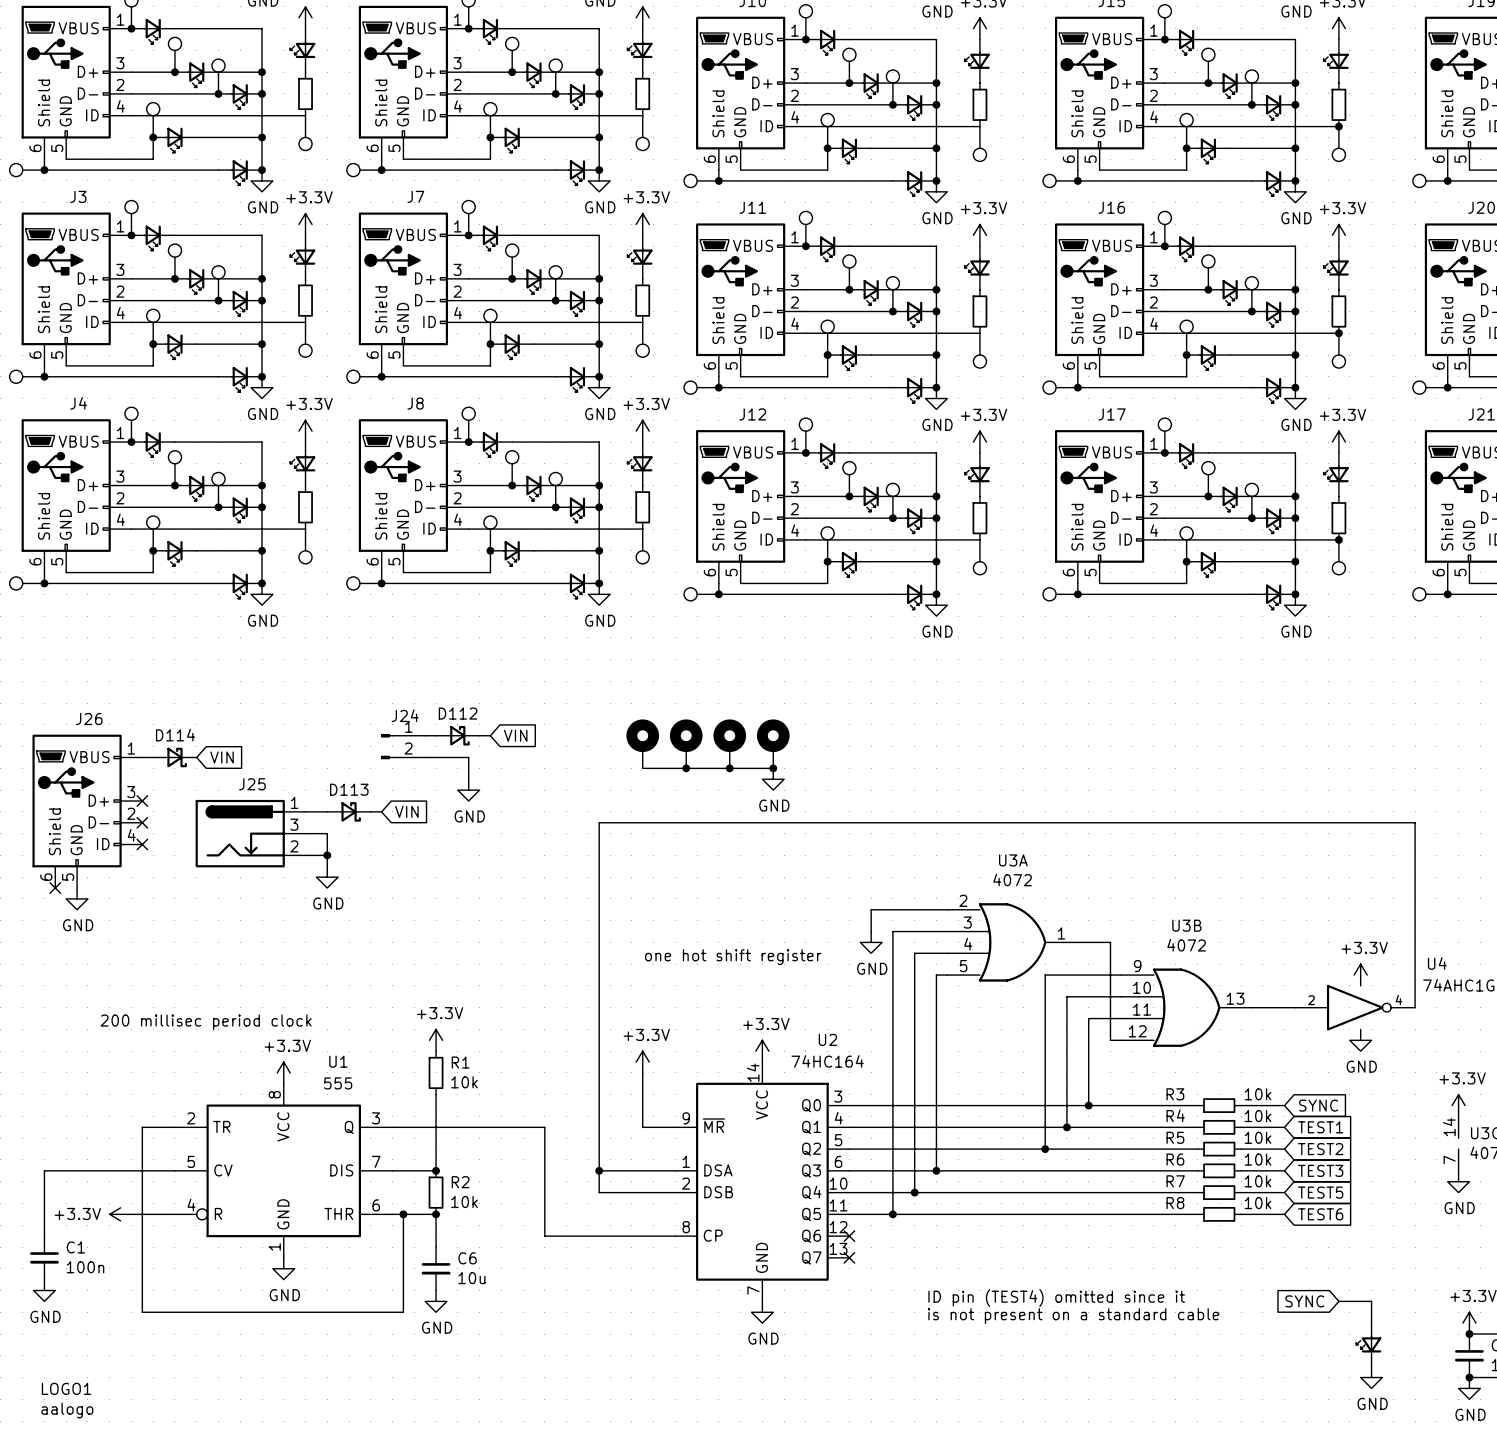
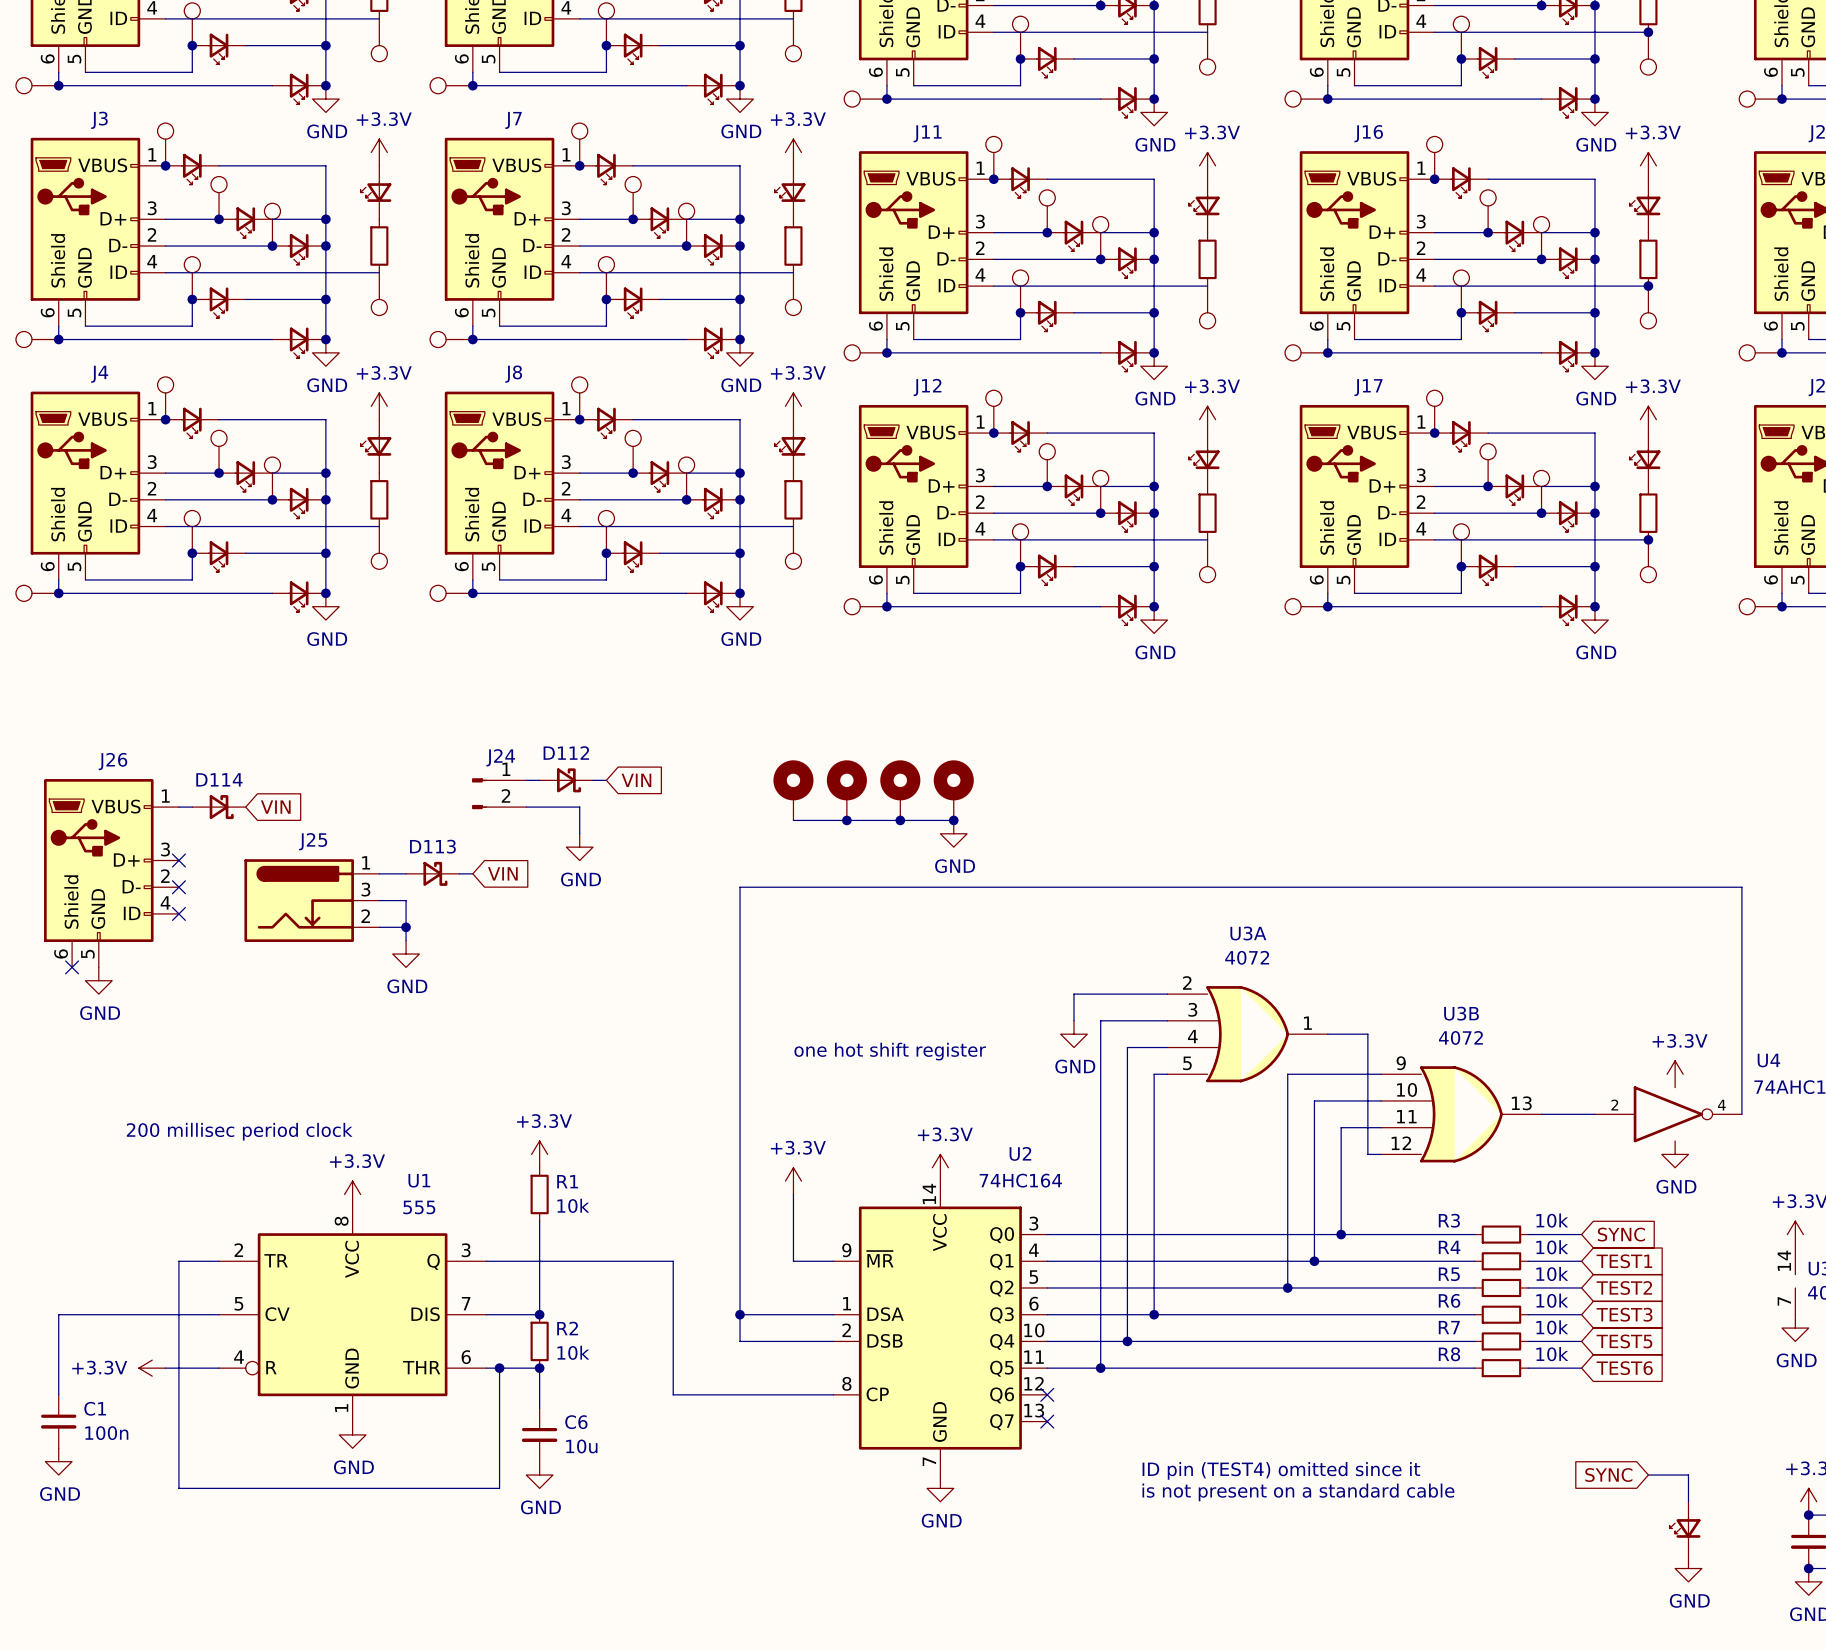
LOGO1: aalogo (67, 1400) -> none

